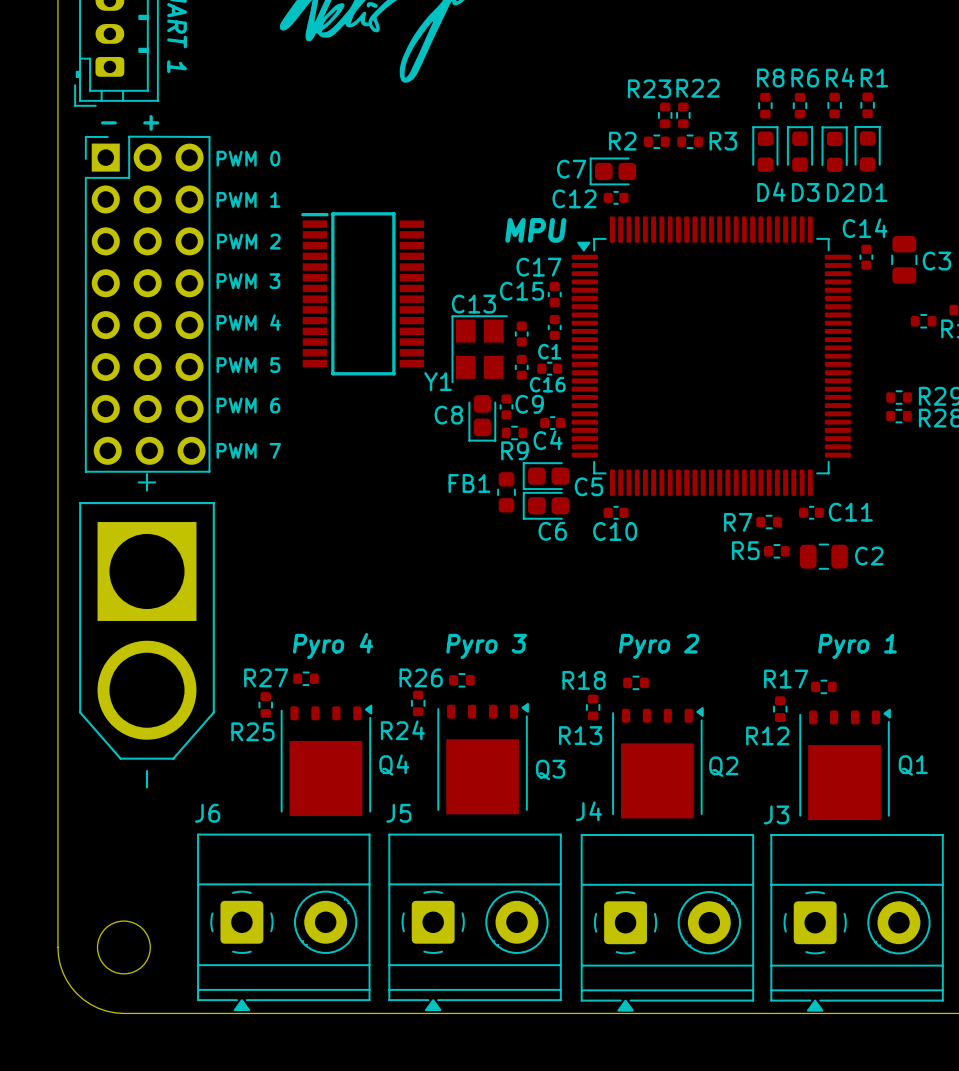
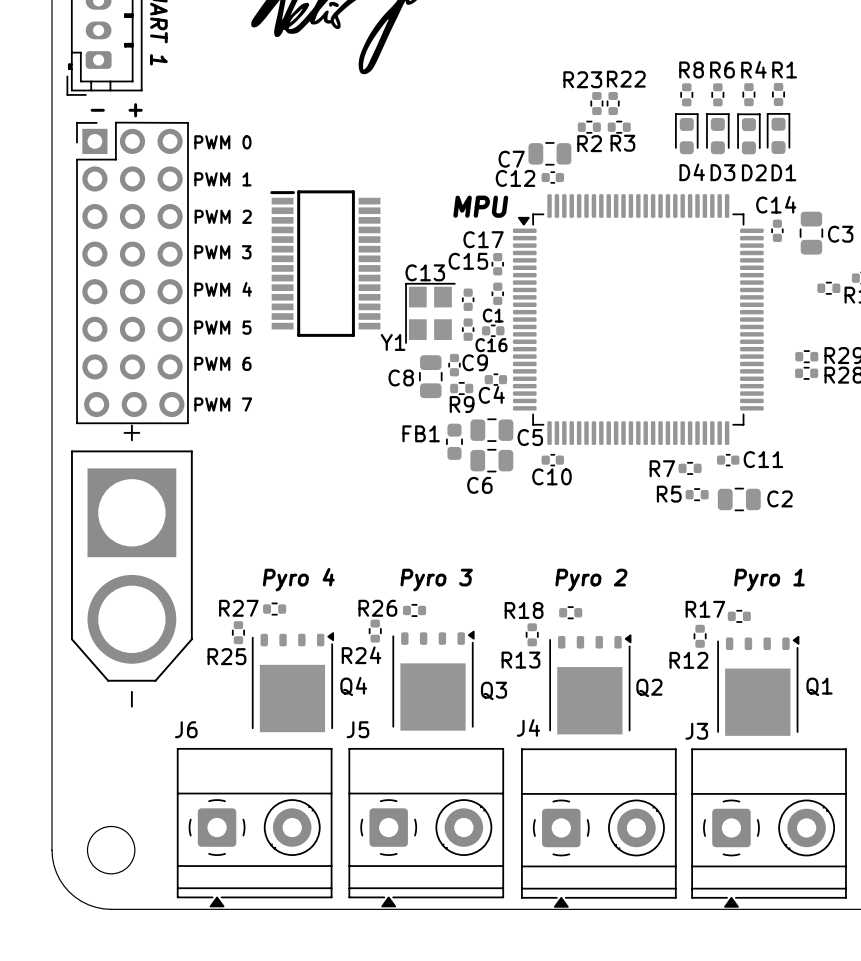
R2 name position: R2 (622, 141) -> R2 (589, 143)
R3 name position: R3 (723, 141) -> R3 (622, 143)
C7 footprint: [589, 157, 637, 186] -> [528, 142, 572, 166]
C8 footprint: [468, 395, 497, 442] -> [419, 355, 443, 399]
C5 footprint: [522, 462, 570, 491] -> [470, 418, 514, 442]
C6 footprint: [522, 491, 570, 520] -> [470, 448, 514, 473]

